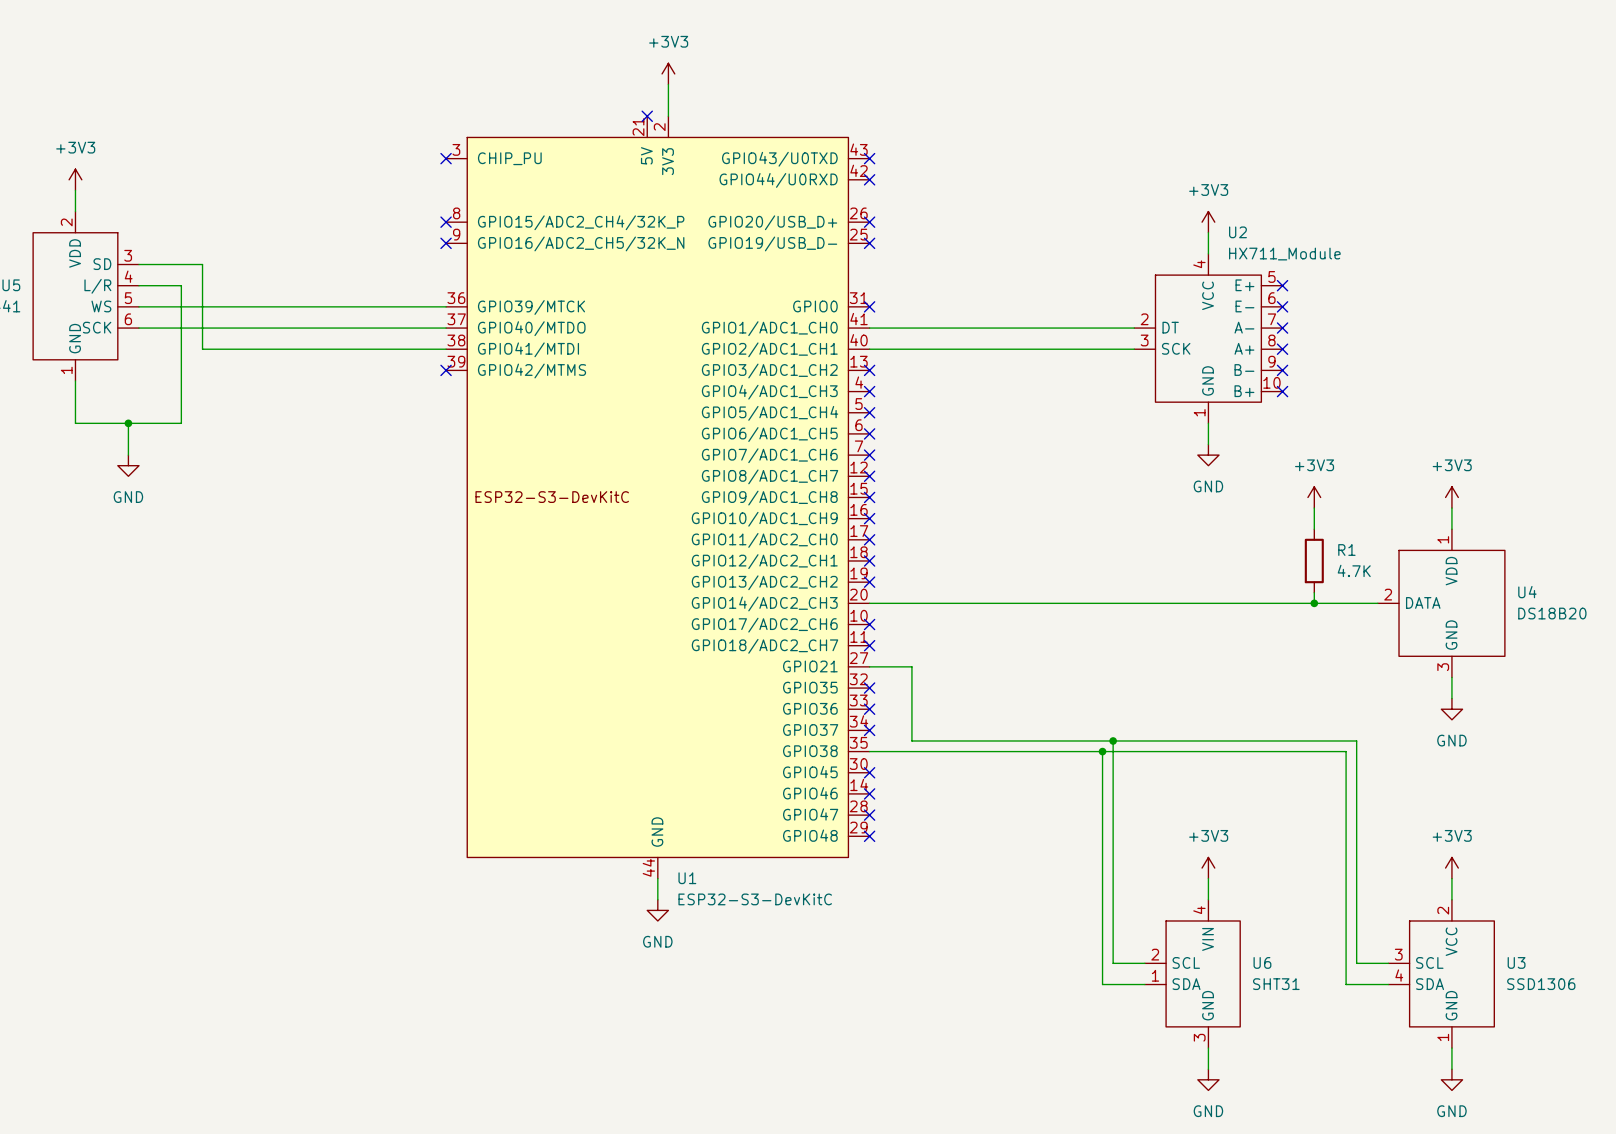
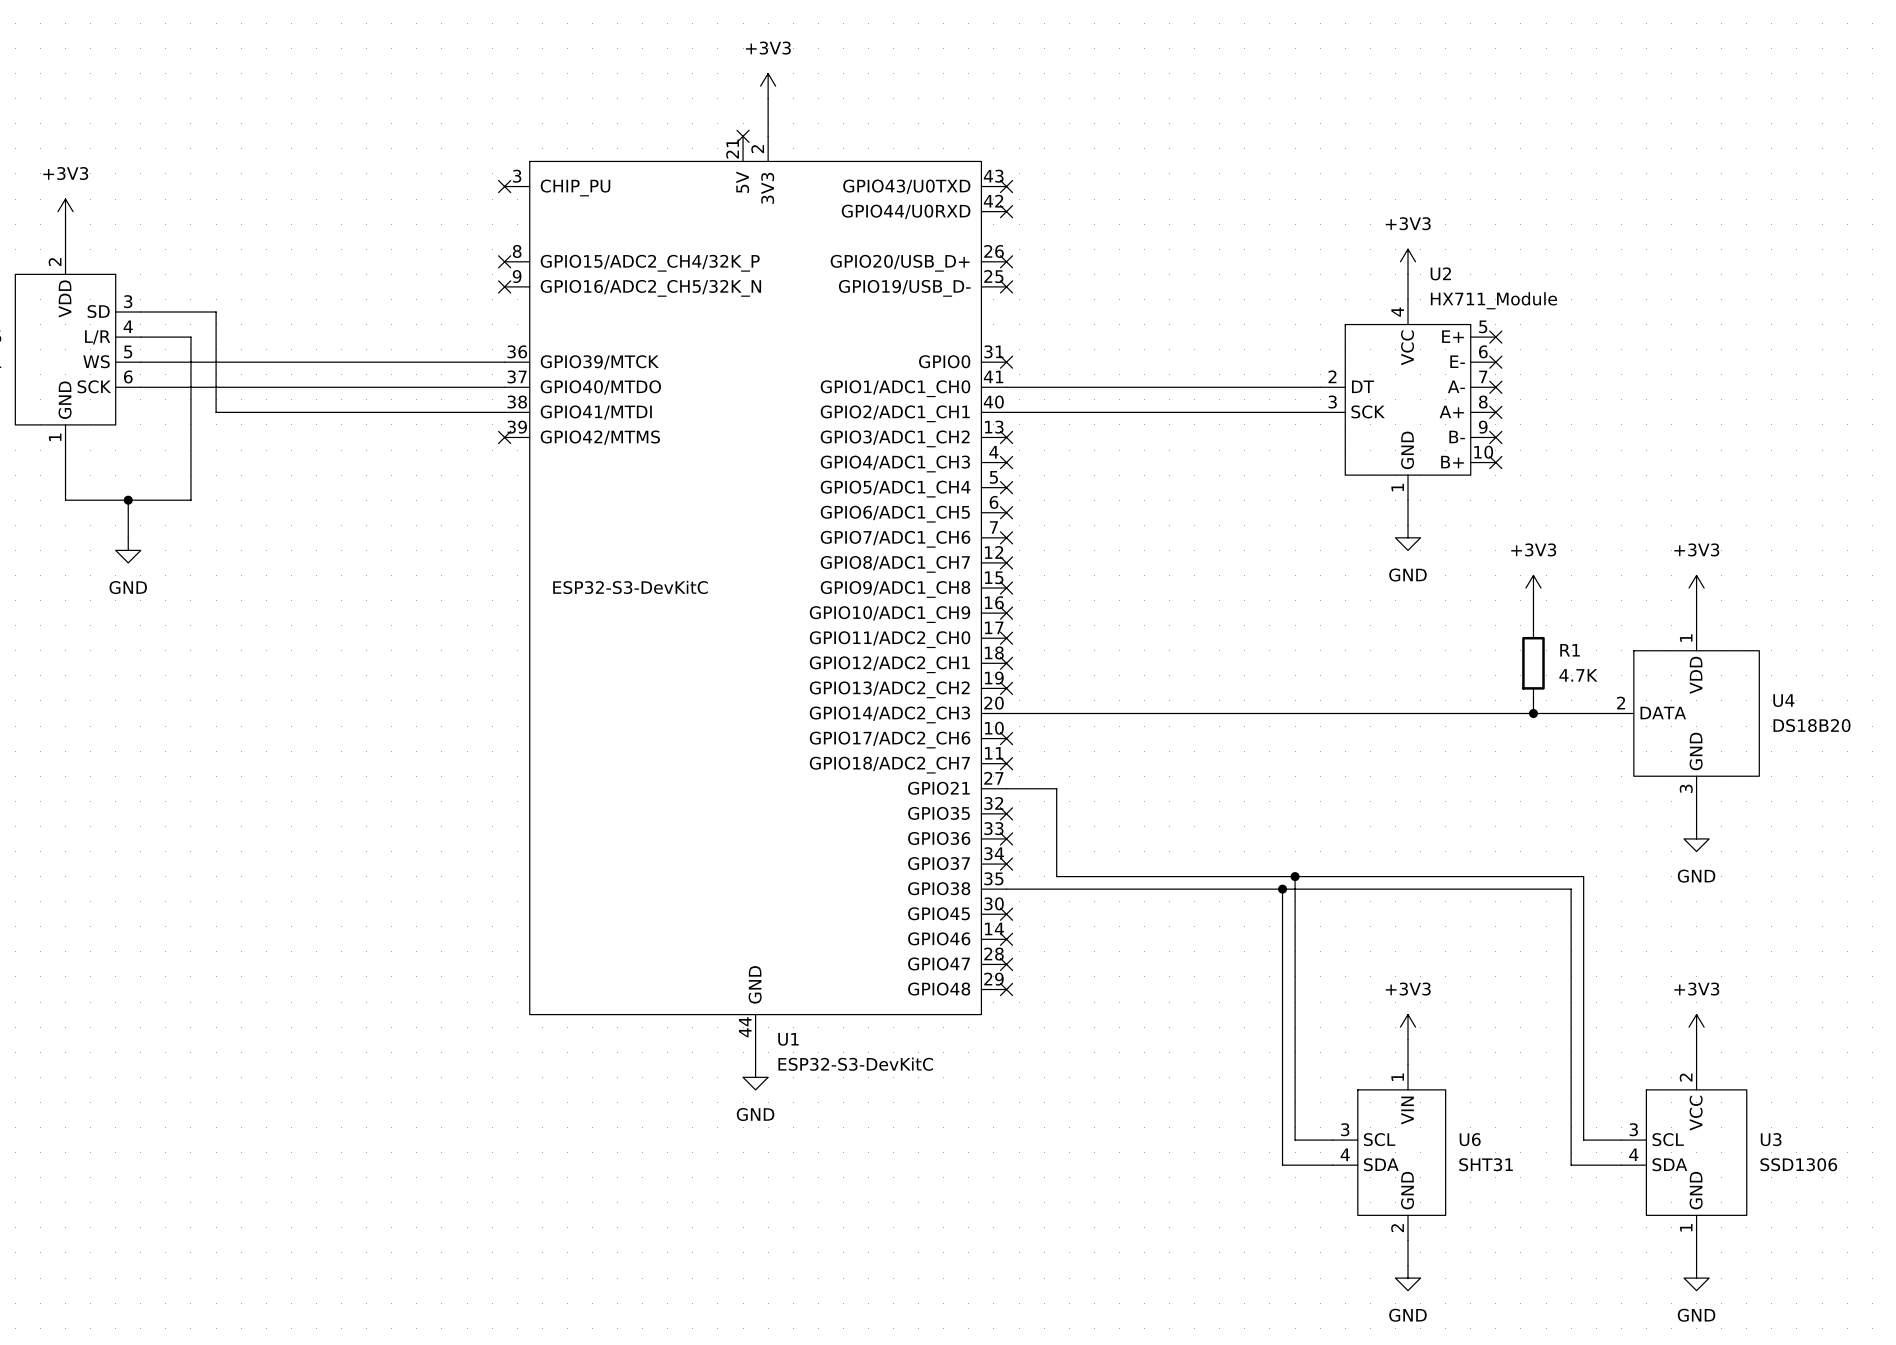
U6 pin number: 4 (1199, 910) -> 1 (1397, 1077)
U6 pin number: 2 (1155, 954) -> 3 (1345, 1129)
U6 pin number: 1 (1155, 975) -> 4 (1345, 1154)
U6 pin number: 3 (1199, 1037) -> 2 (1397, 1228)

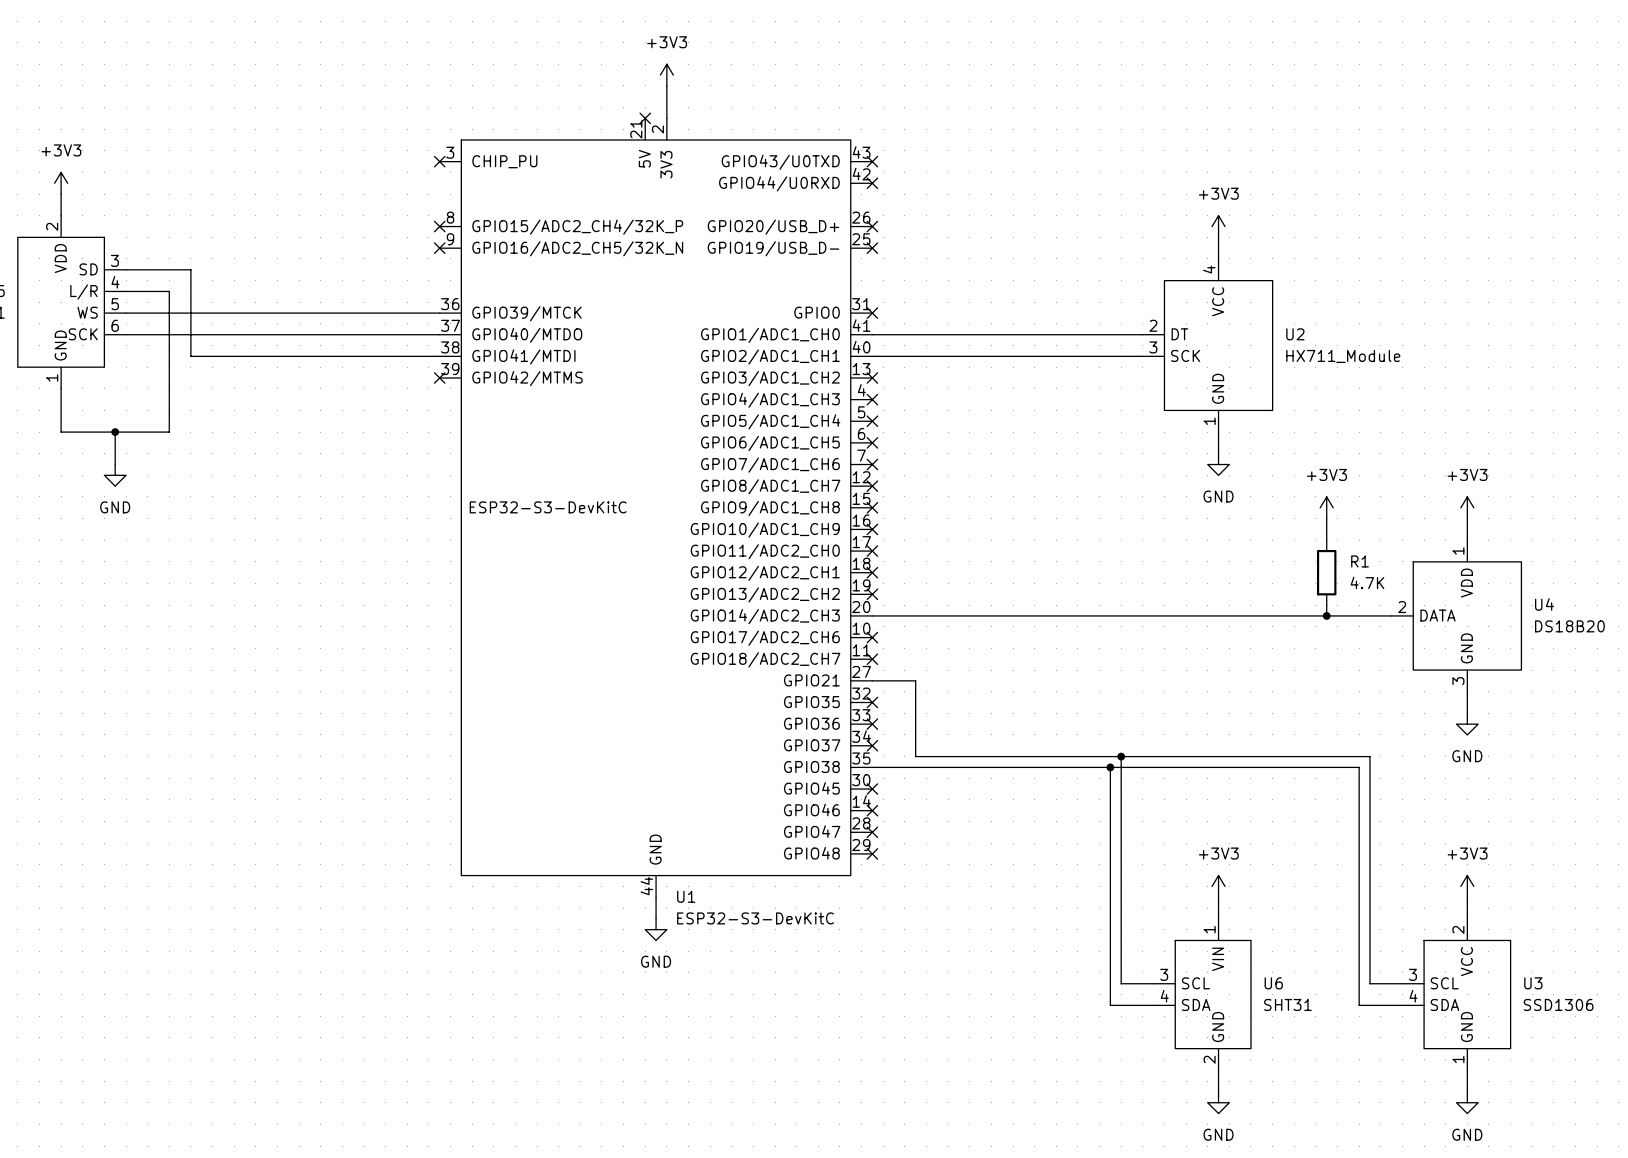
U2 name position: U2 (1440, 273) -> U2 (1295, 334)
U2 symbol: [1320, 299, 1496, 501] -> [1142, 258, 1273, 433]
U2 value position: HX711_Module (1493, 300) -> HX711_Module (1343, 356)
no-connect mark: (1495, 337) -> none
no-connect mark: (1495, 362) -> none
no-connect mark: (1495, 387) -> none
no-connect mark: (1495, 412) -> none
no-connect mark: (1495, 437) -> none
no-connect mark: (1495, 462) -> none

